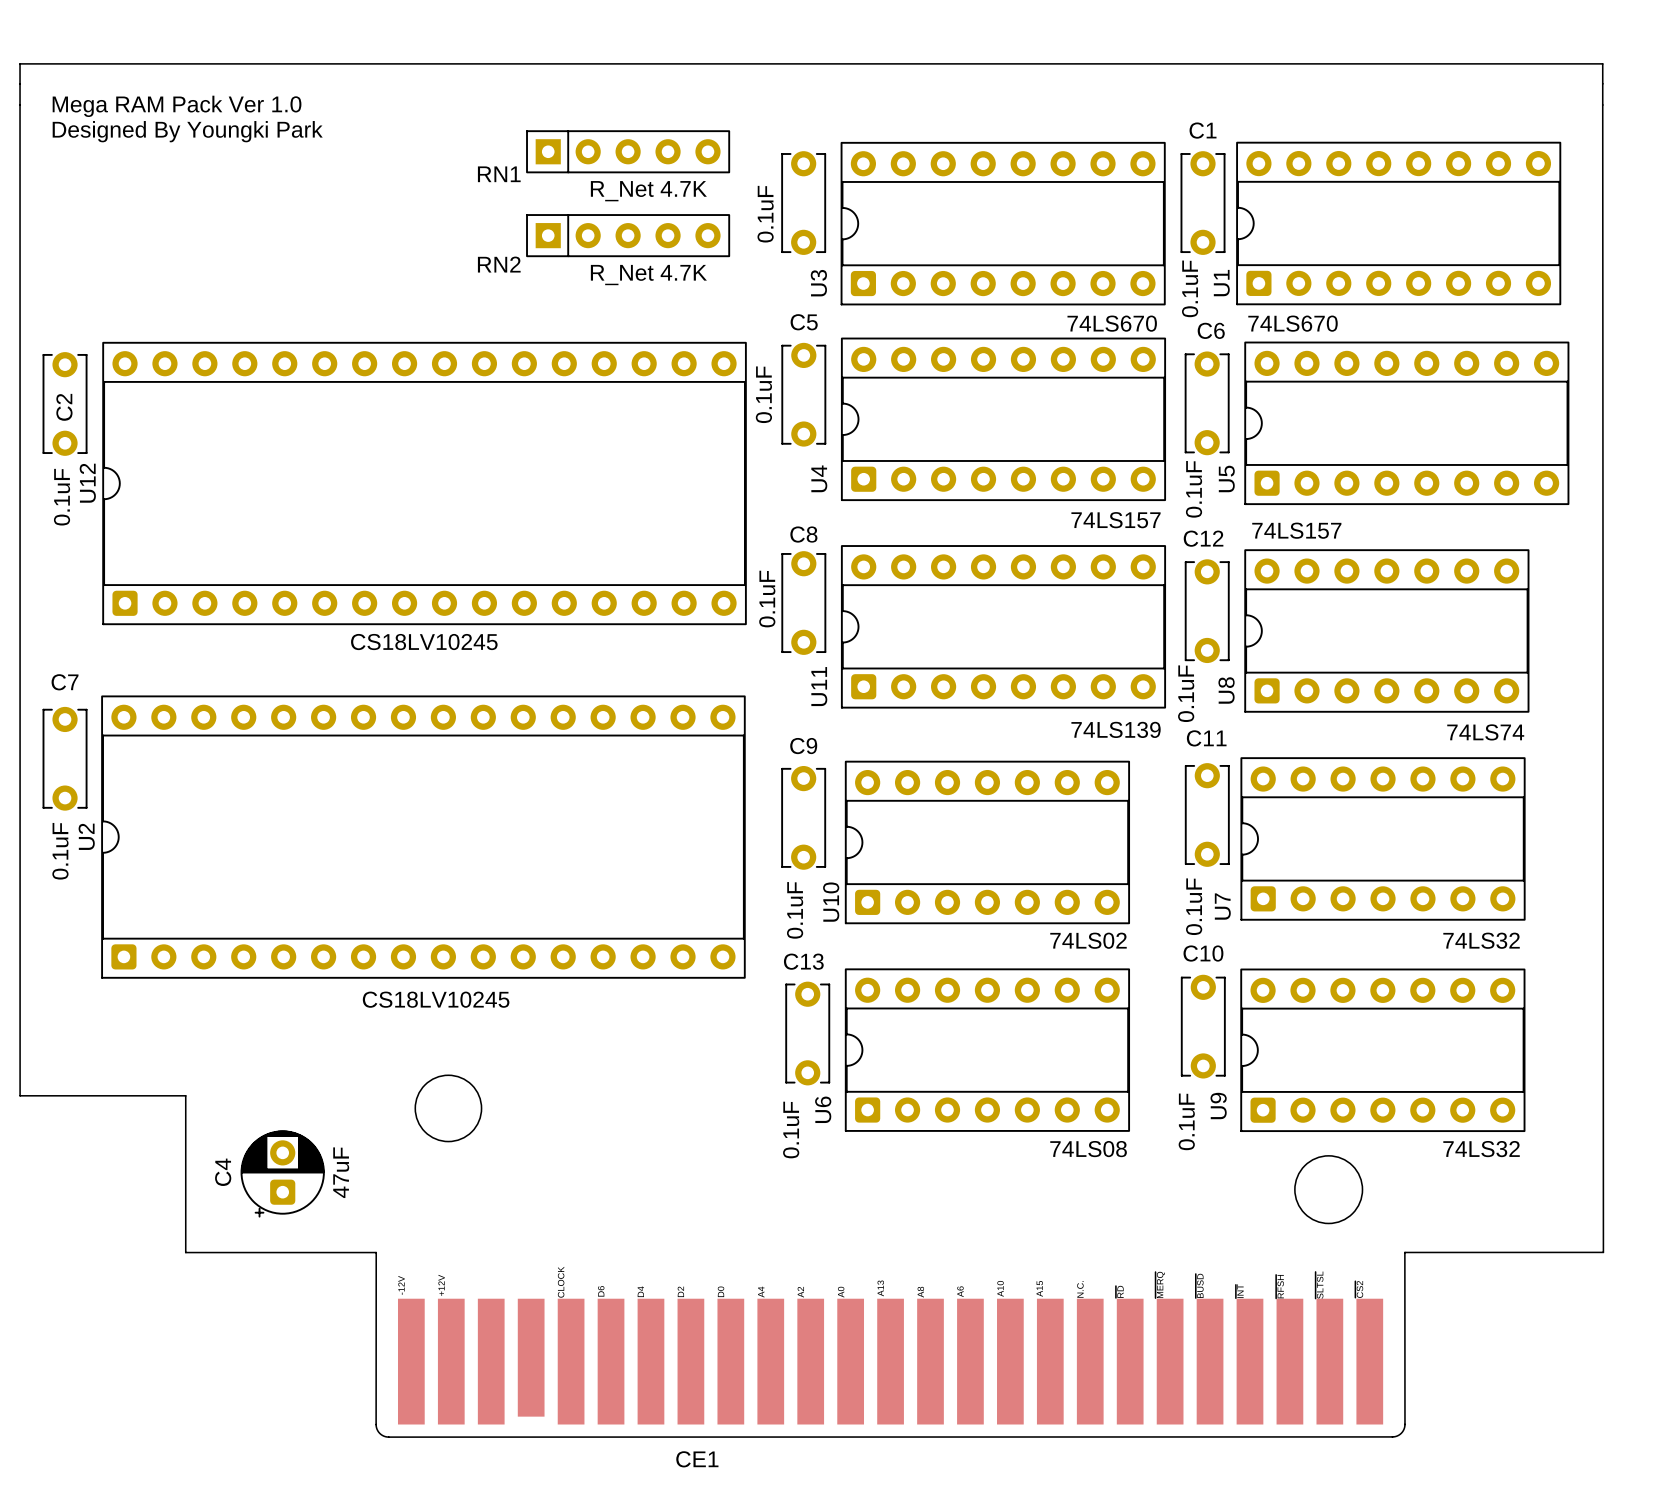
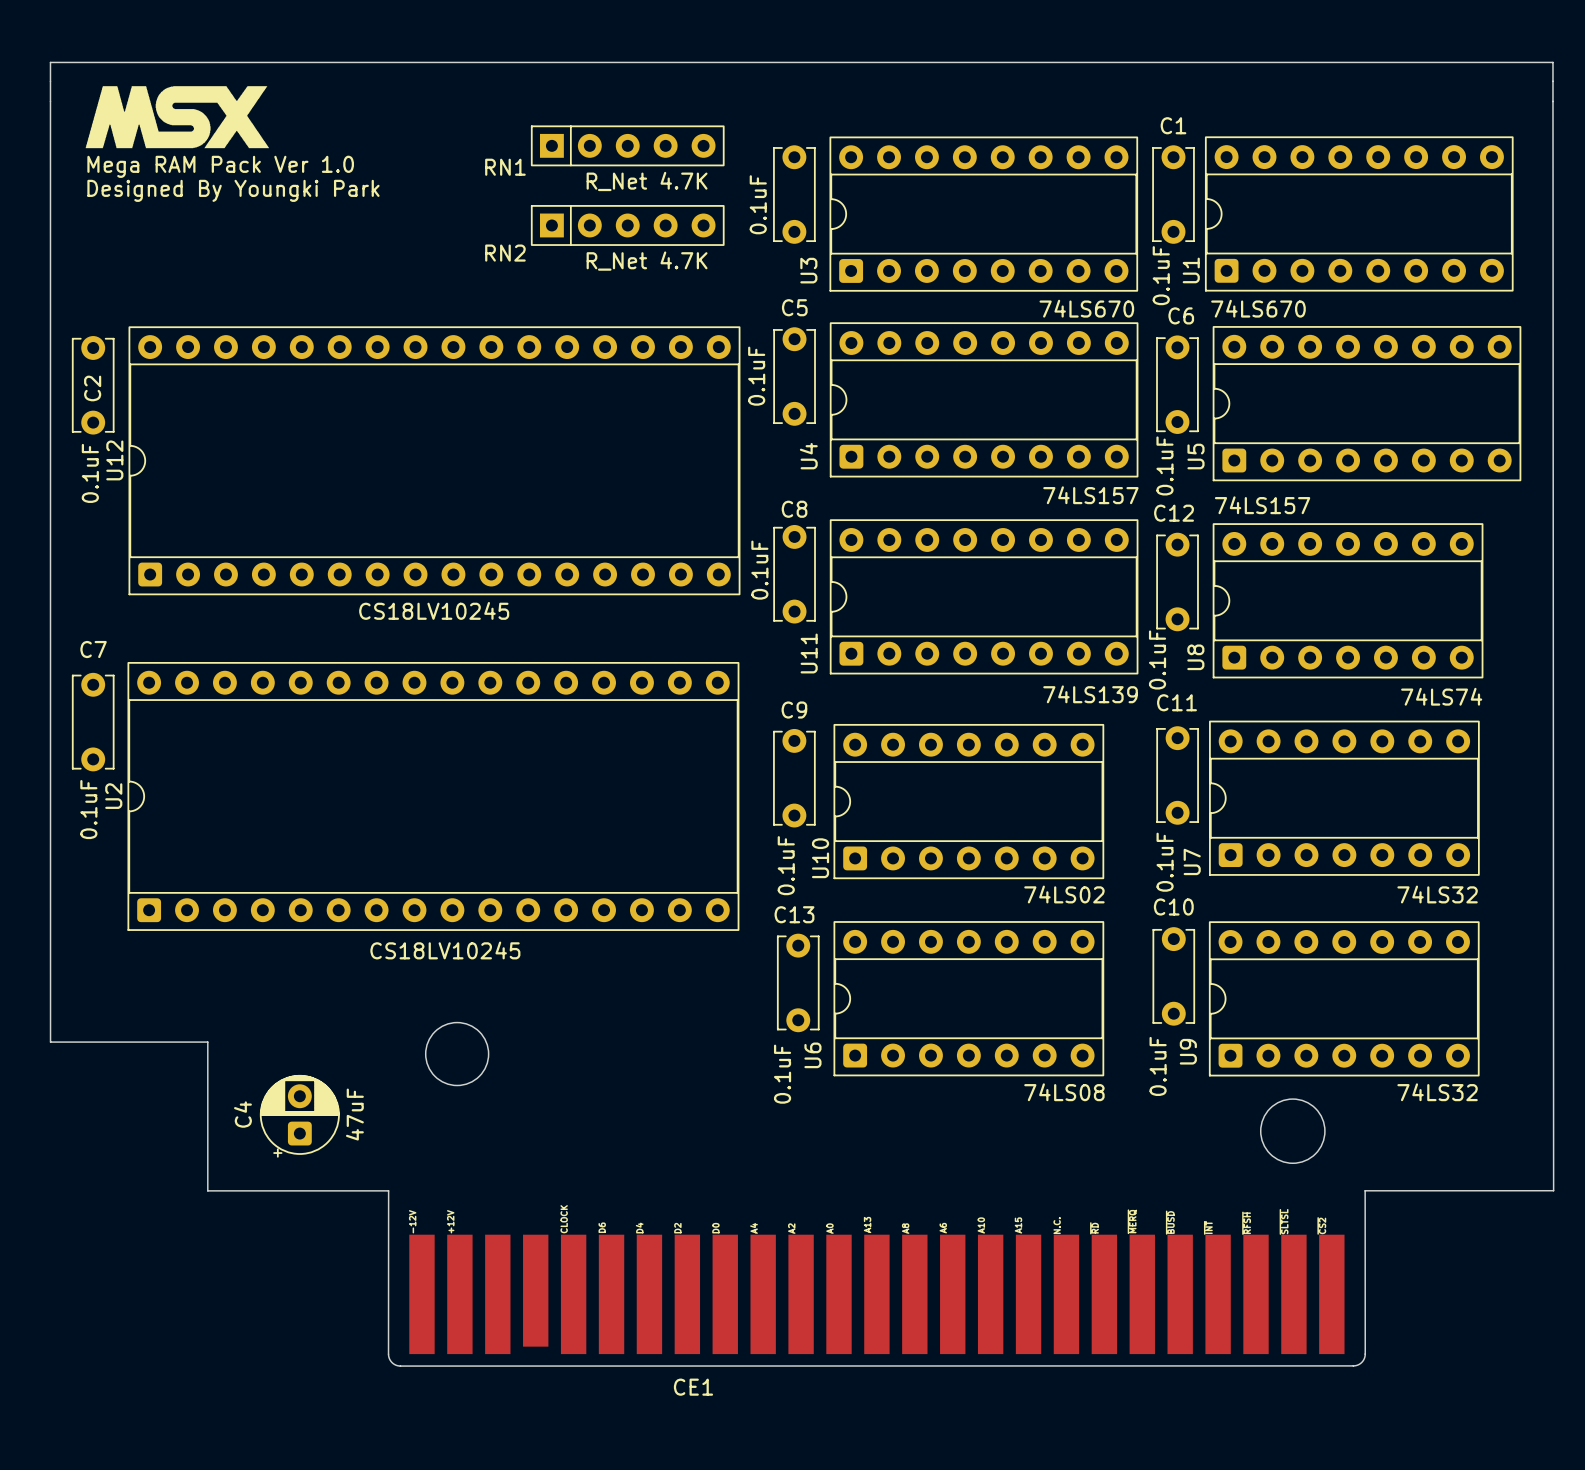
drawing: none -> [85, 86, 270, 149]
text position: Mega RAM Pack Ver 1.0 (177, 106) -> Mega RAM Pack Ver 1.0 (220, 166)
text position: Designed By Youngki Park (187, 131) -> Designed By Youngki Park (233, 190)

